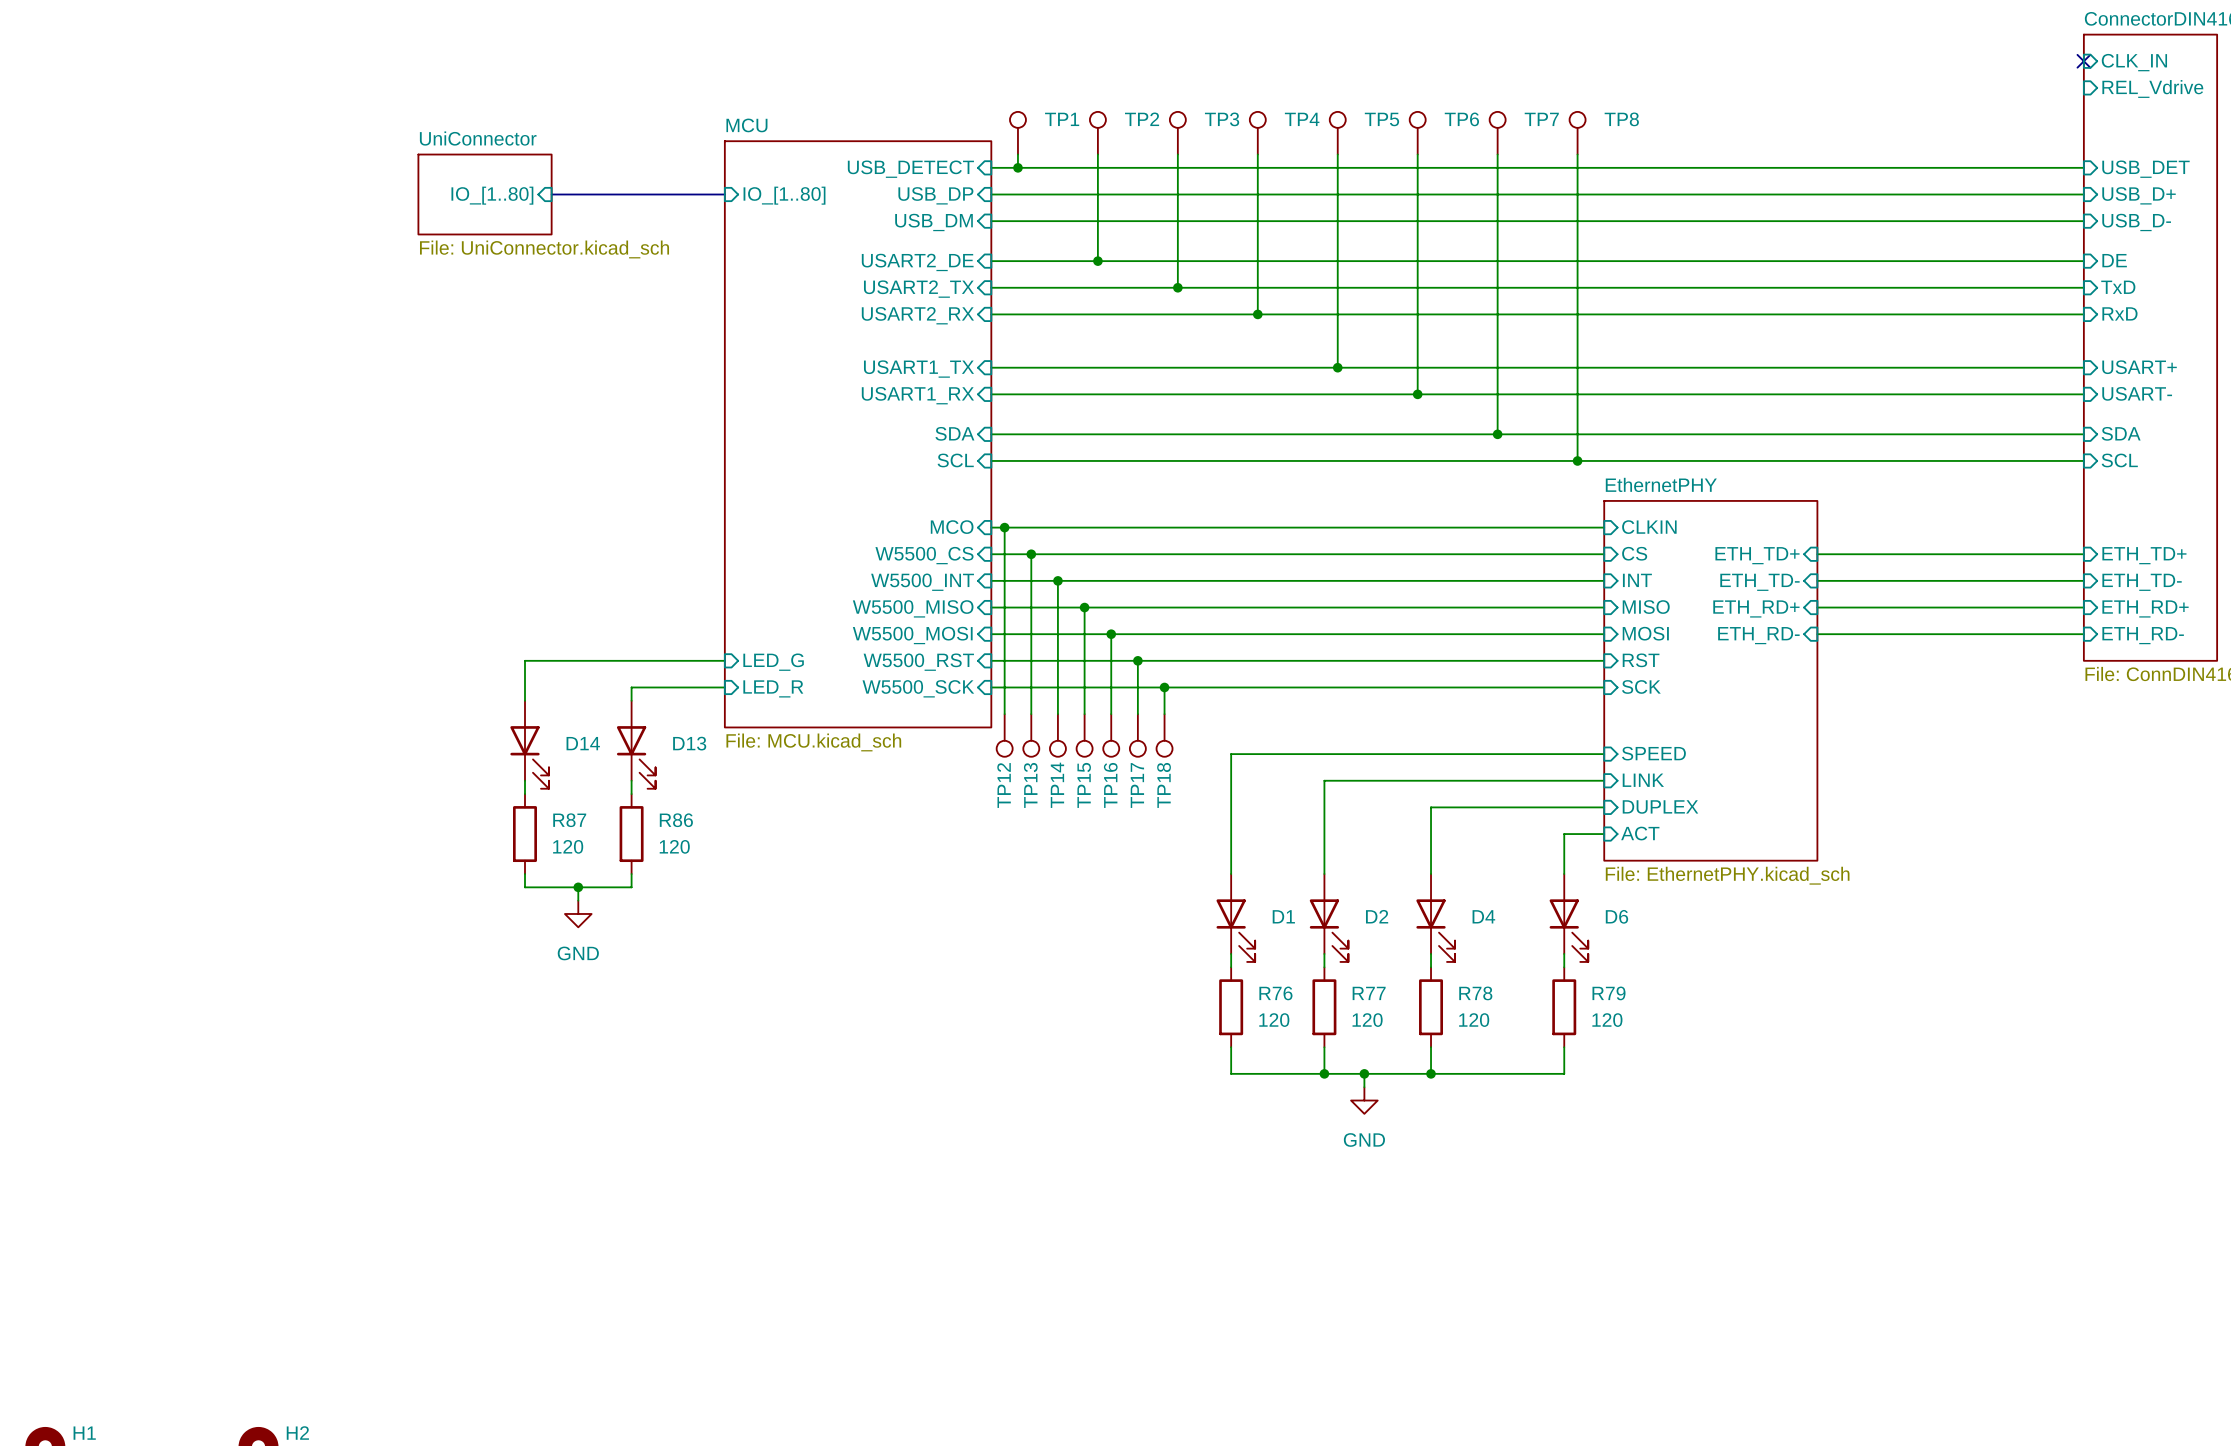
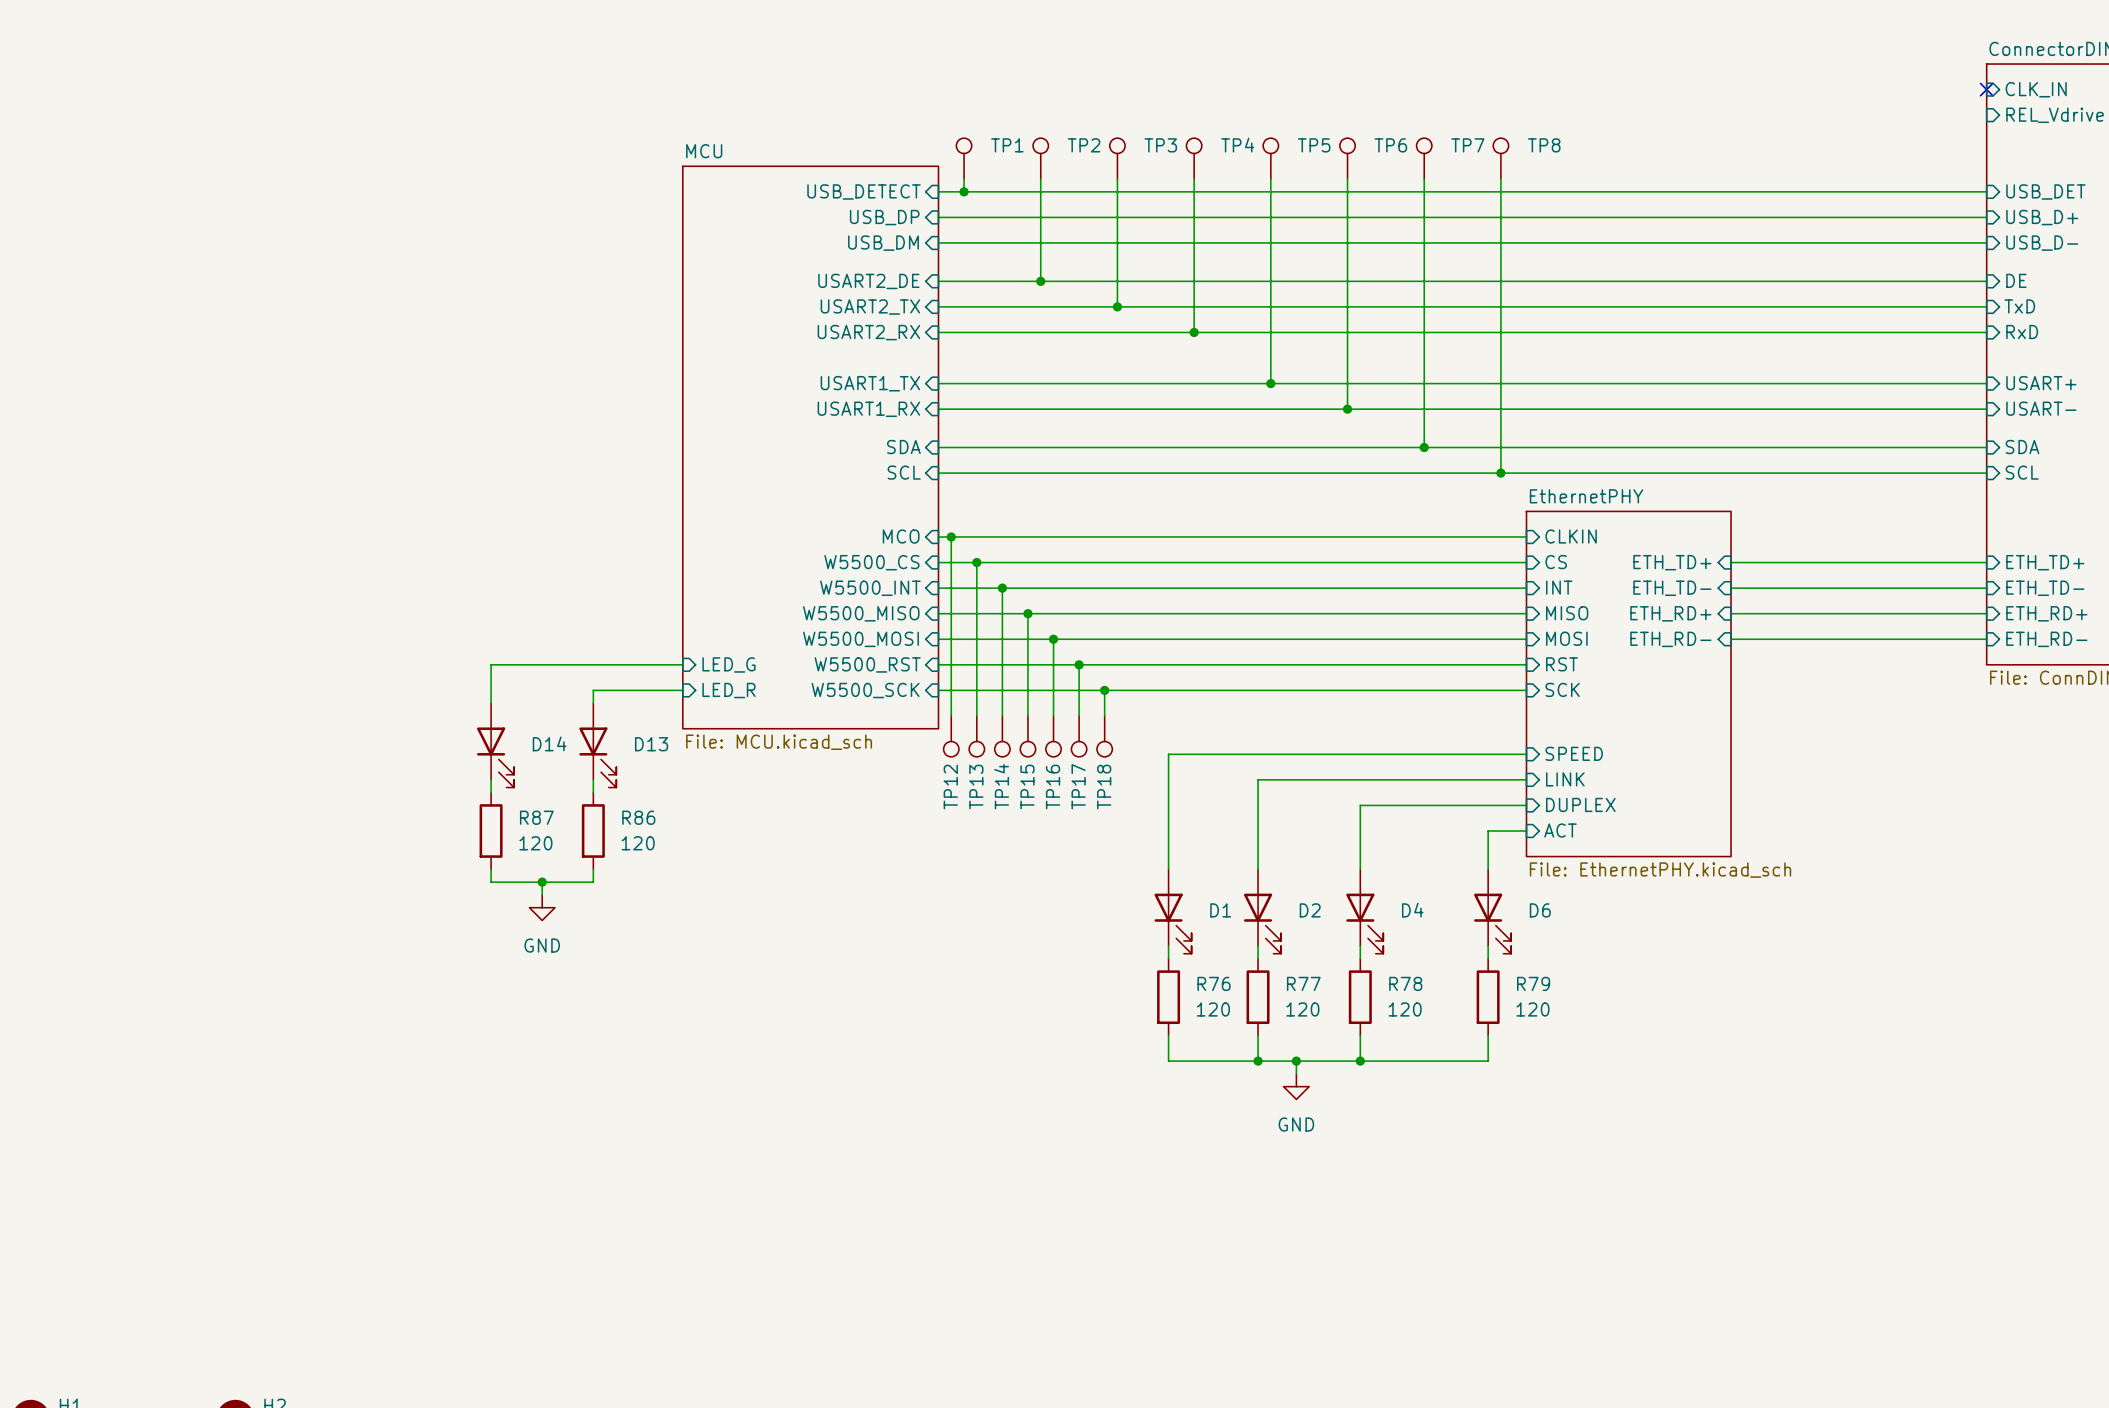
sheet UniConnector: File: UniConnector.kicad_sch (485, 194) -> none
bus: (551, 194) (724, 194) -> none
sheet pin: IO_[1..80] (492, 195) -> none
sheet pin: IO_[1..80] (784, 195) -> none

